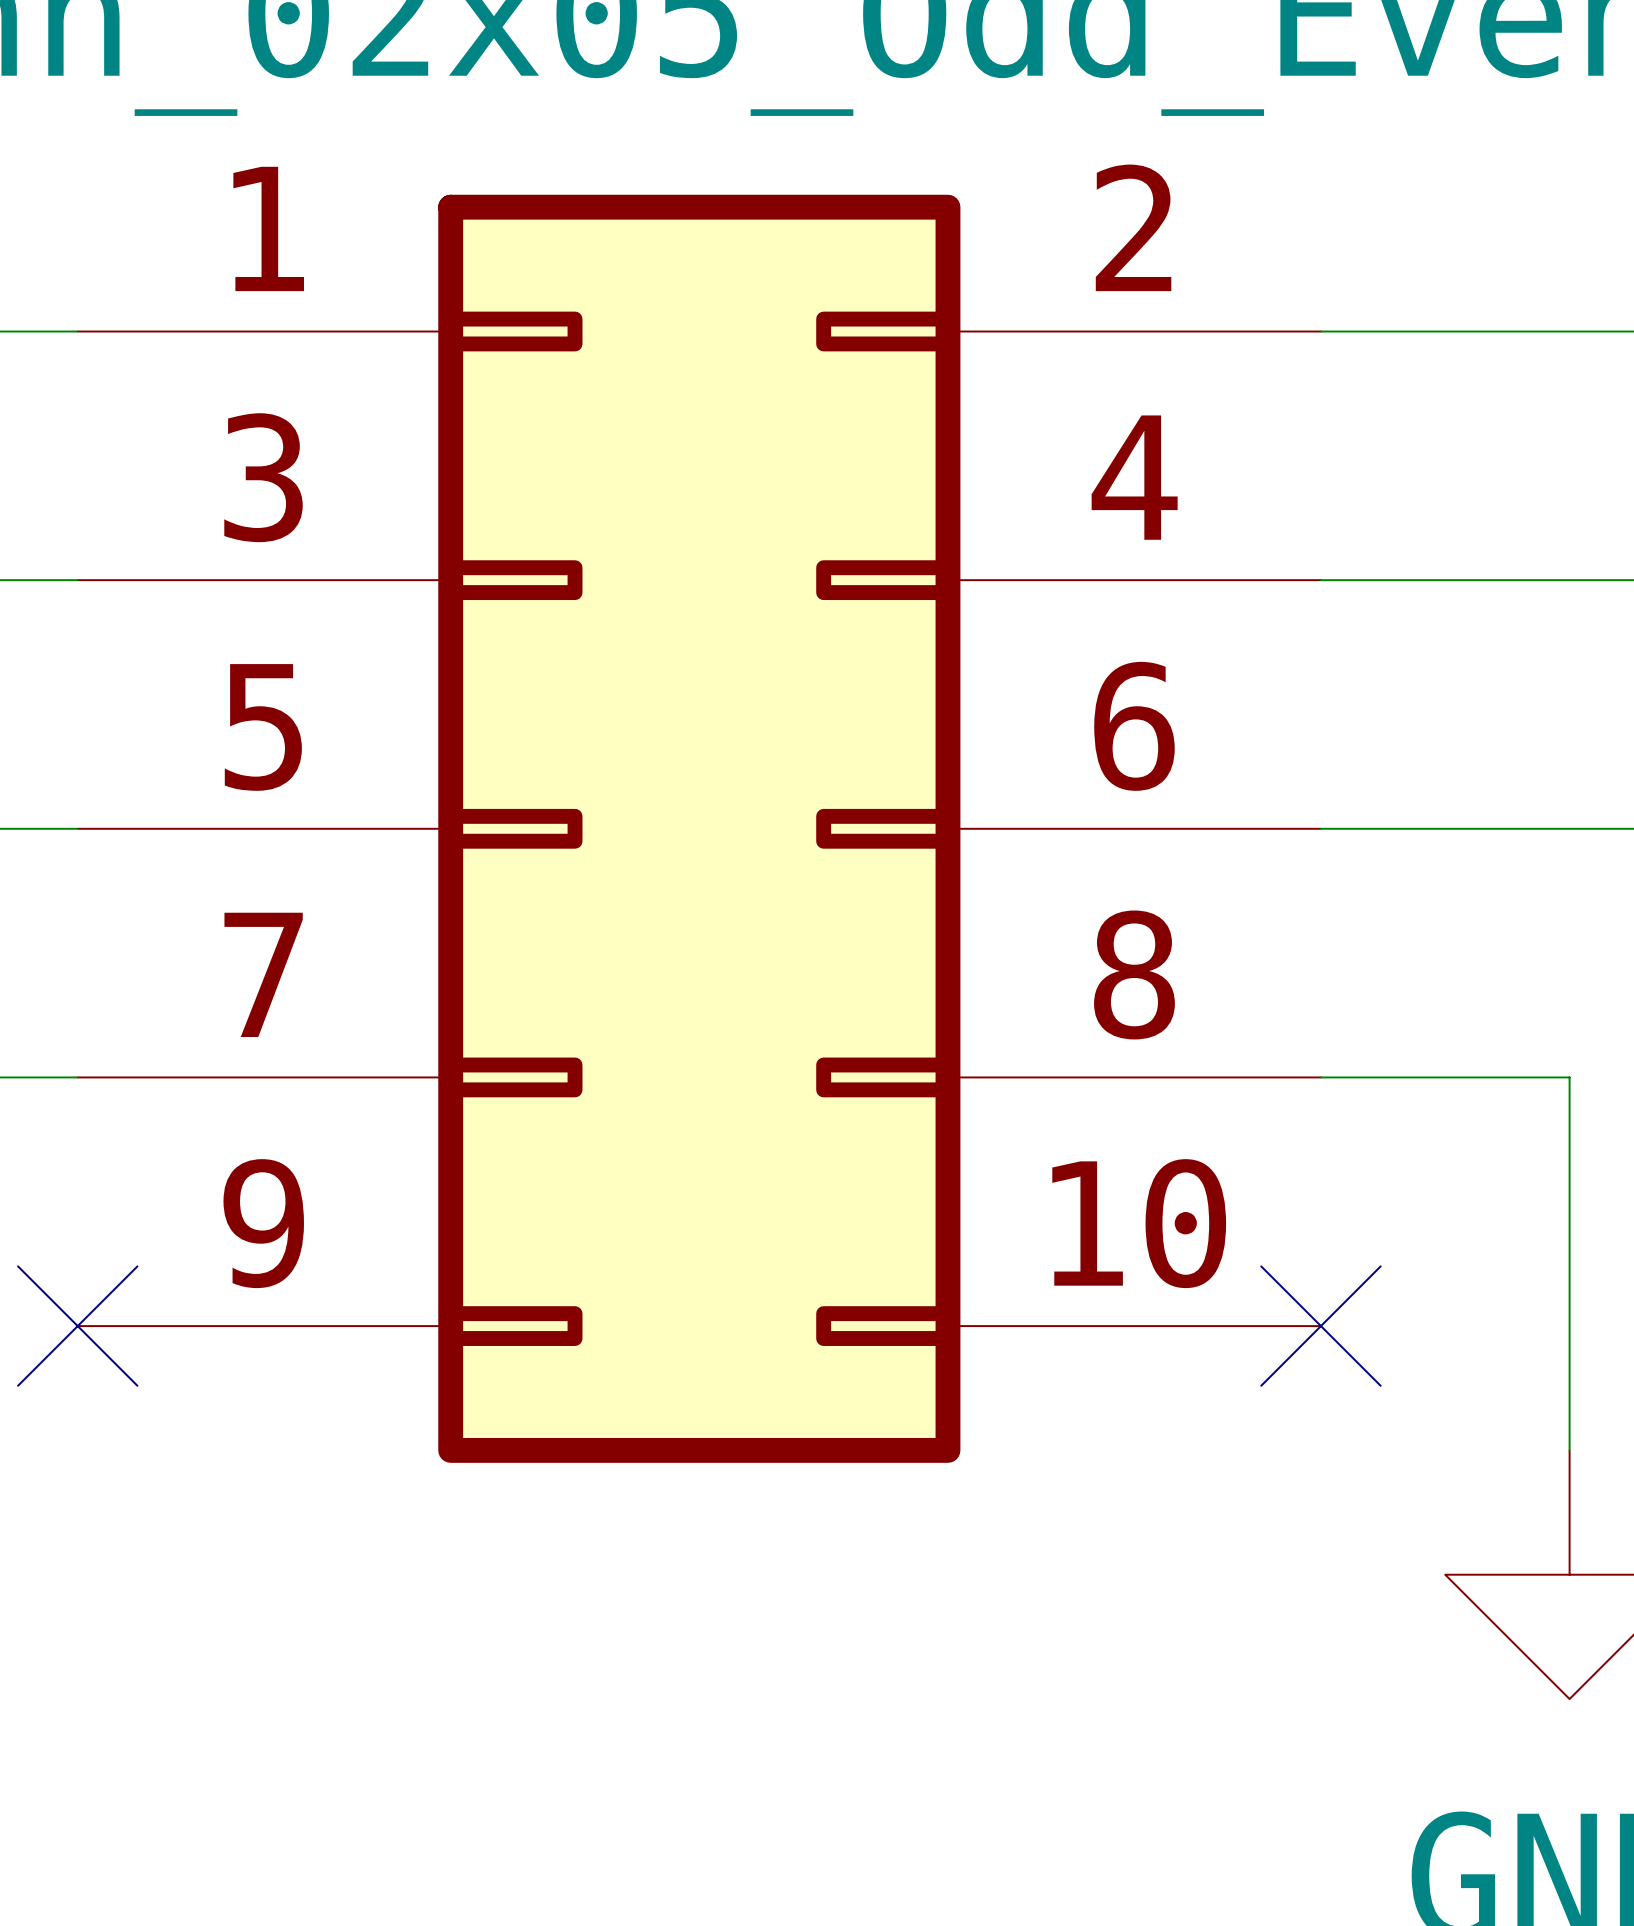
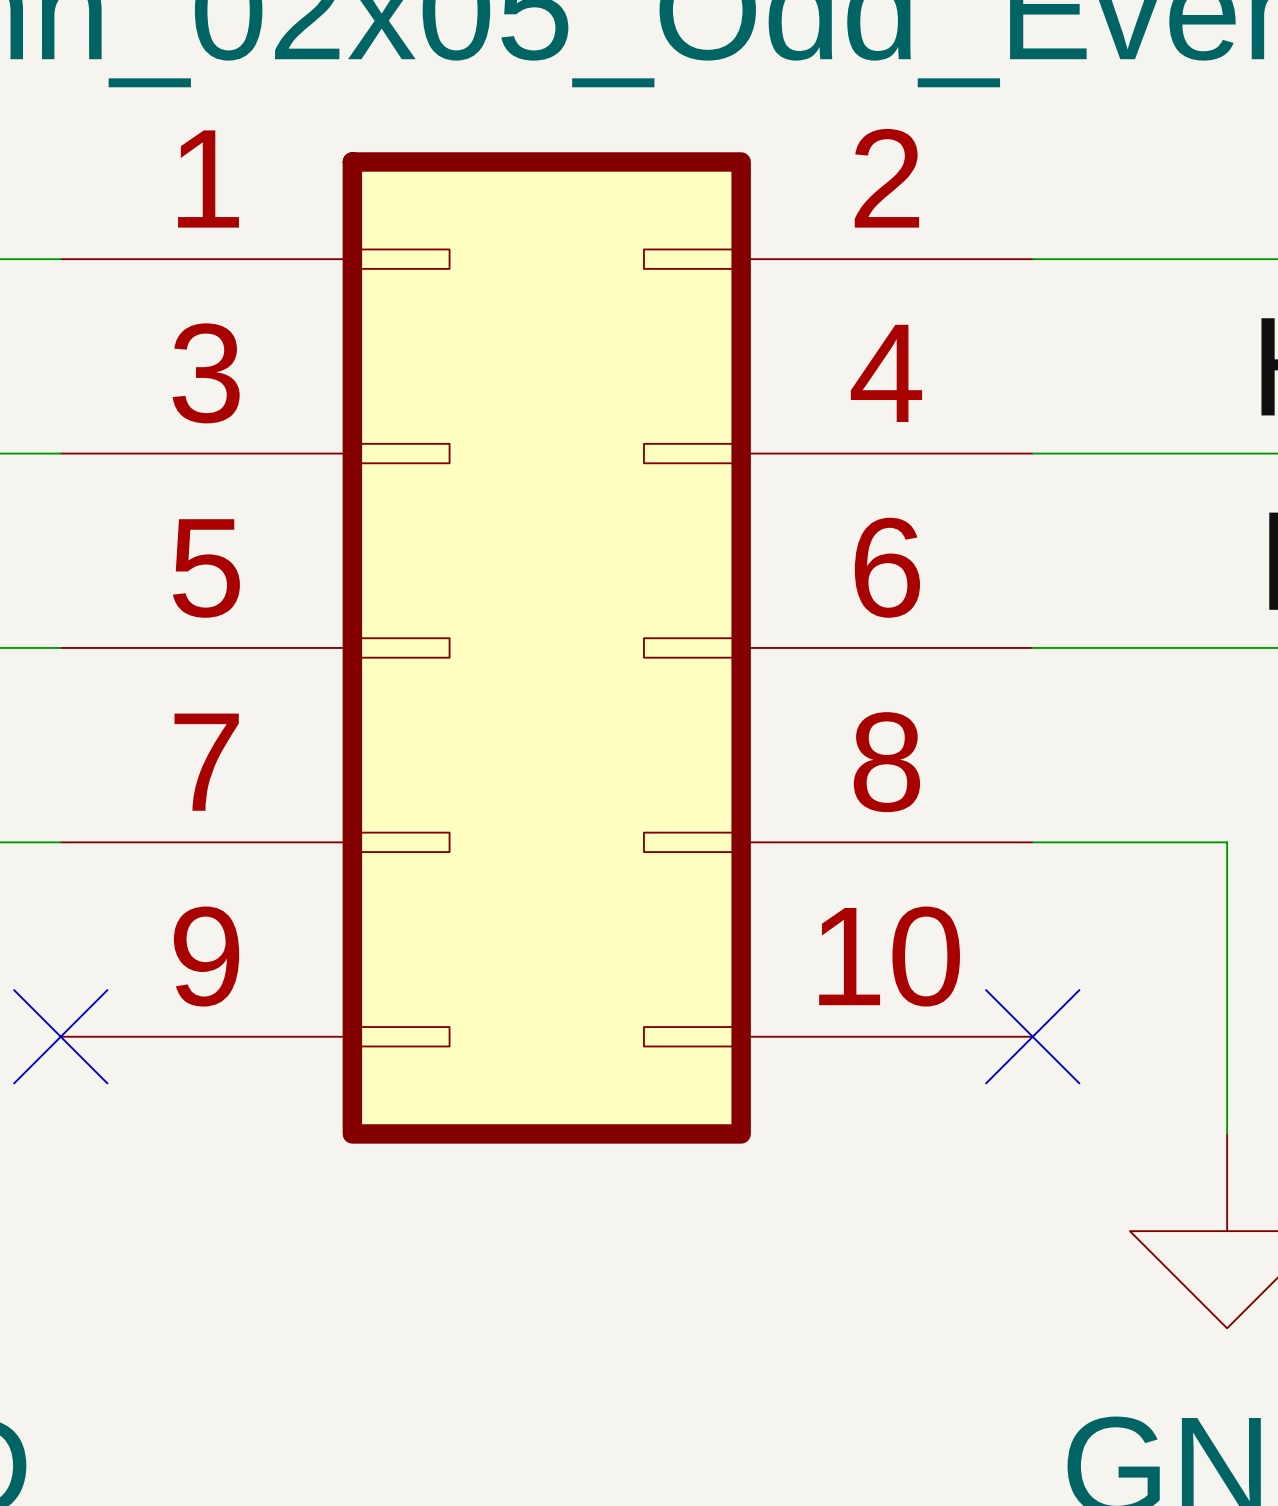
part symbol: [77, 194, 1321, 1463] -> [60, 152, 1033, 1144]

